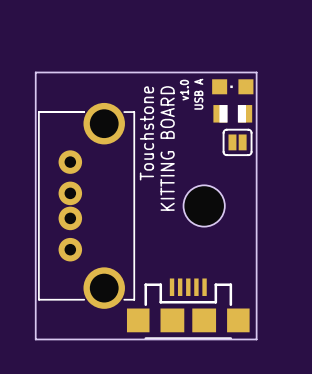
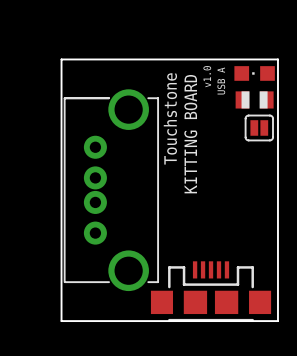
part: (204, 205) -> none

